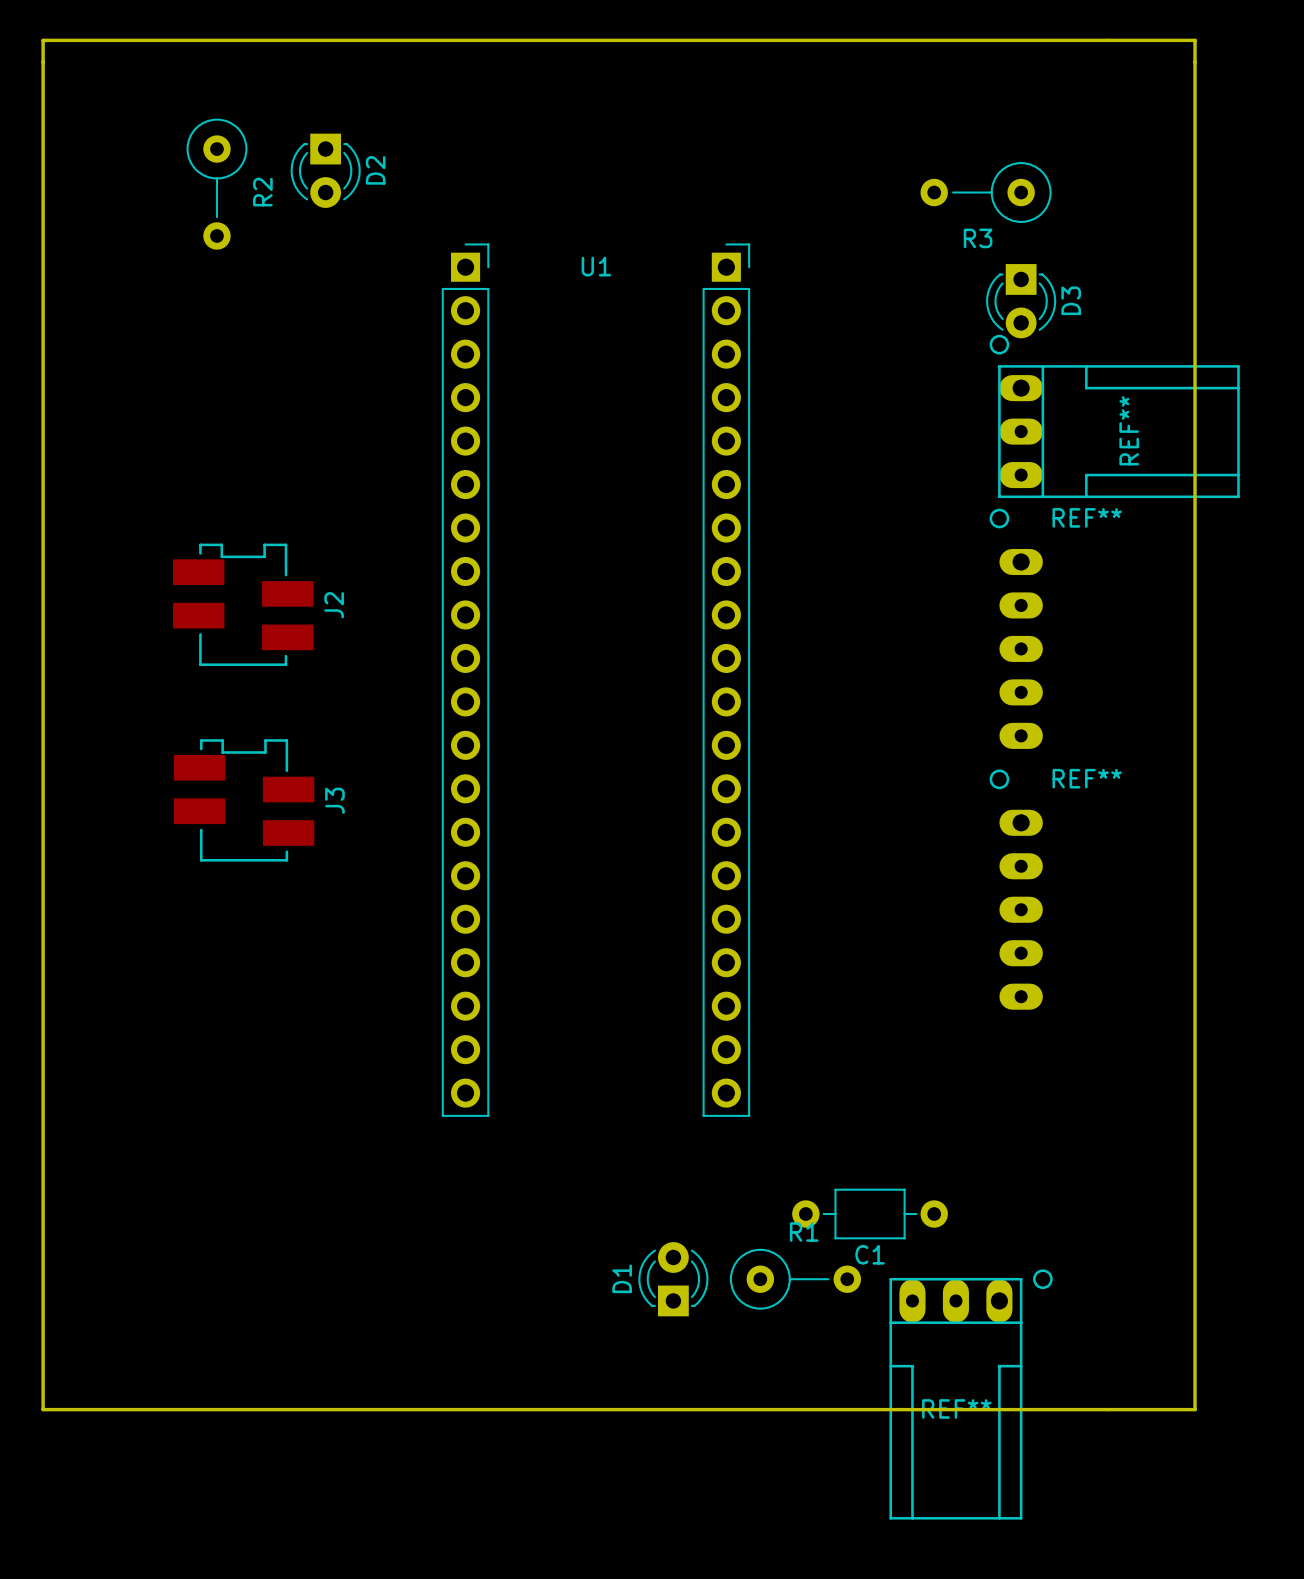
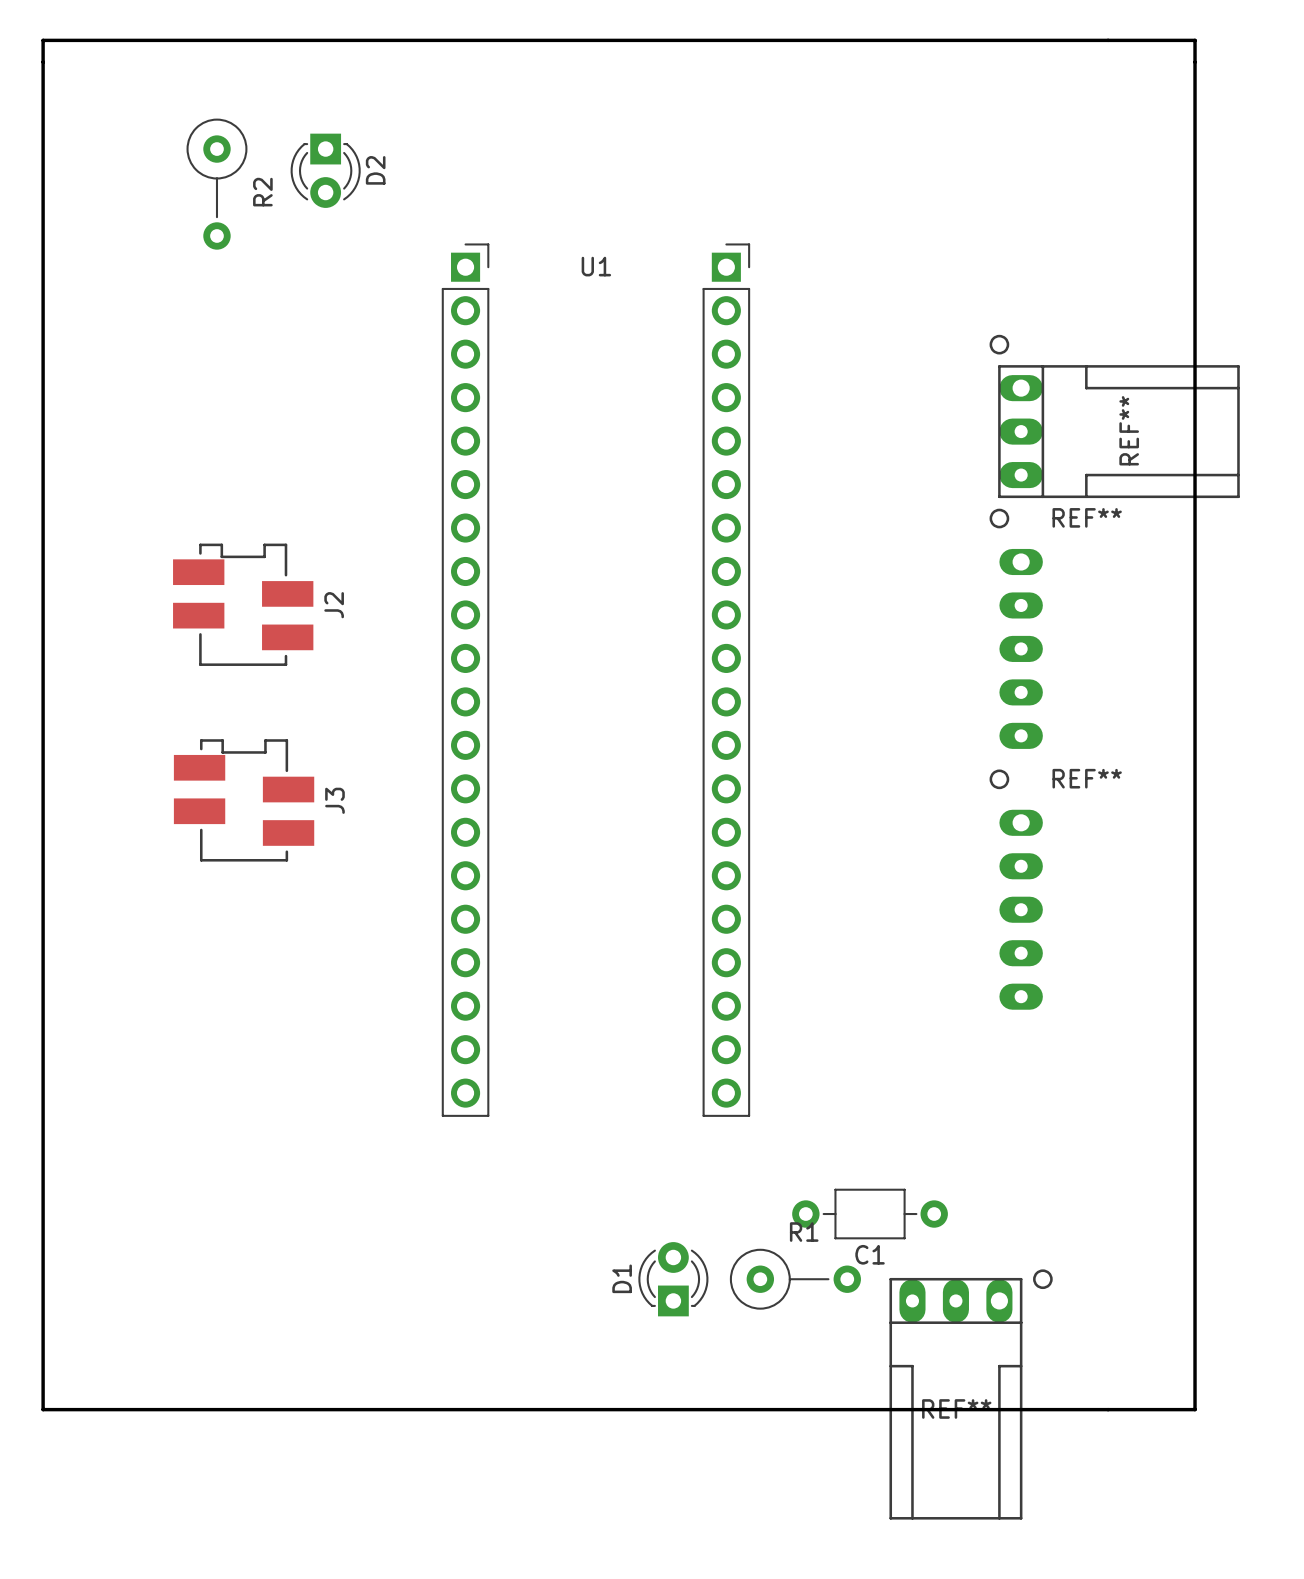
R3: (986, 192) -> none
D3: (1021, 301) -> none

